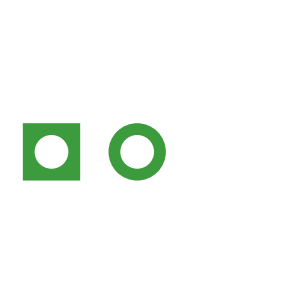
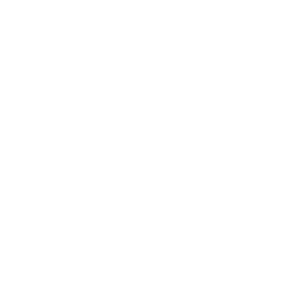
part: (94, 151) -> none

